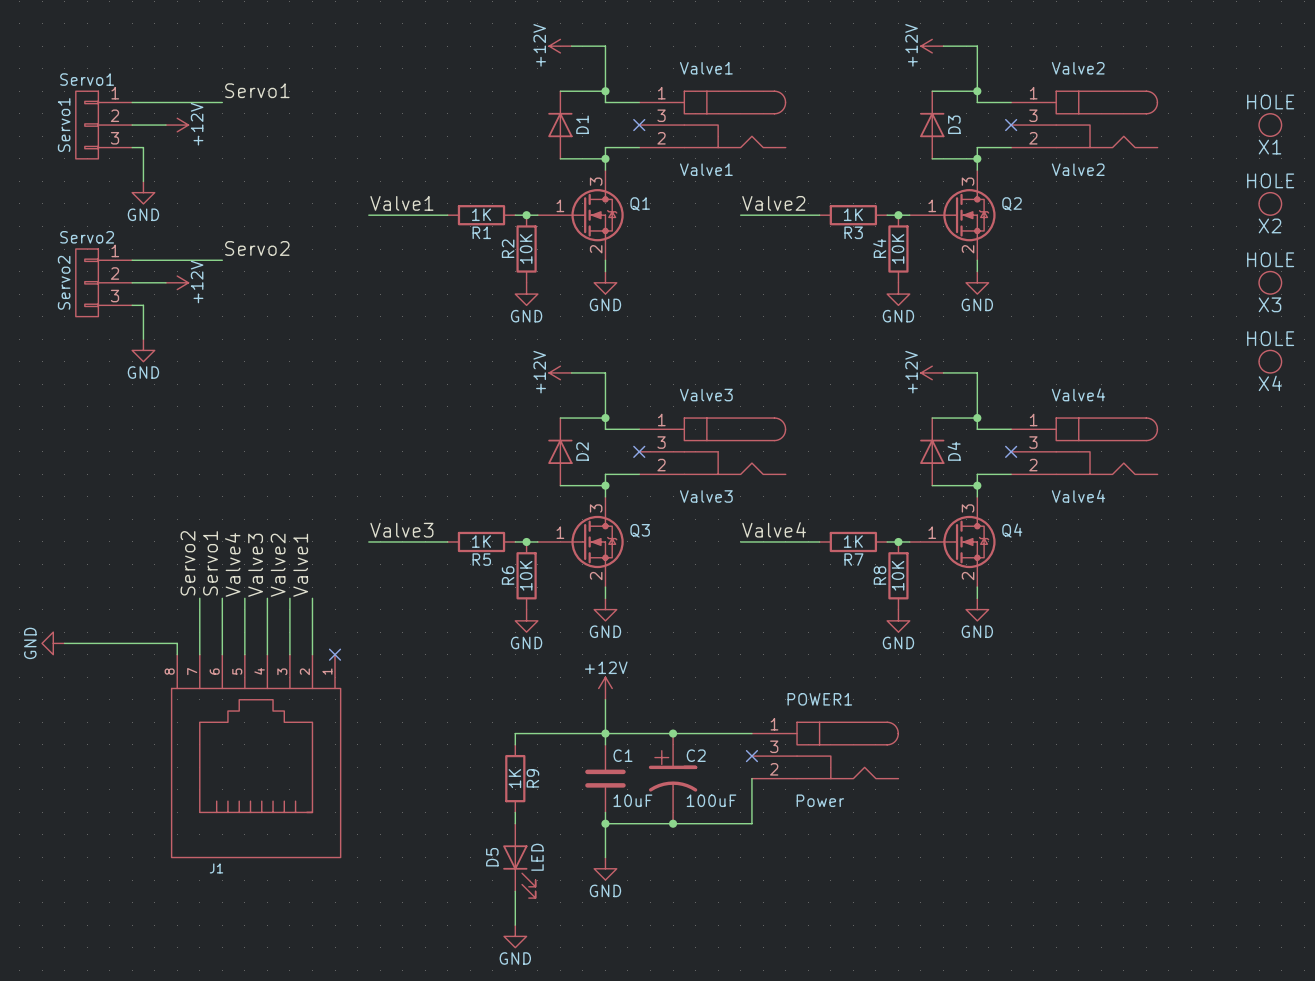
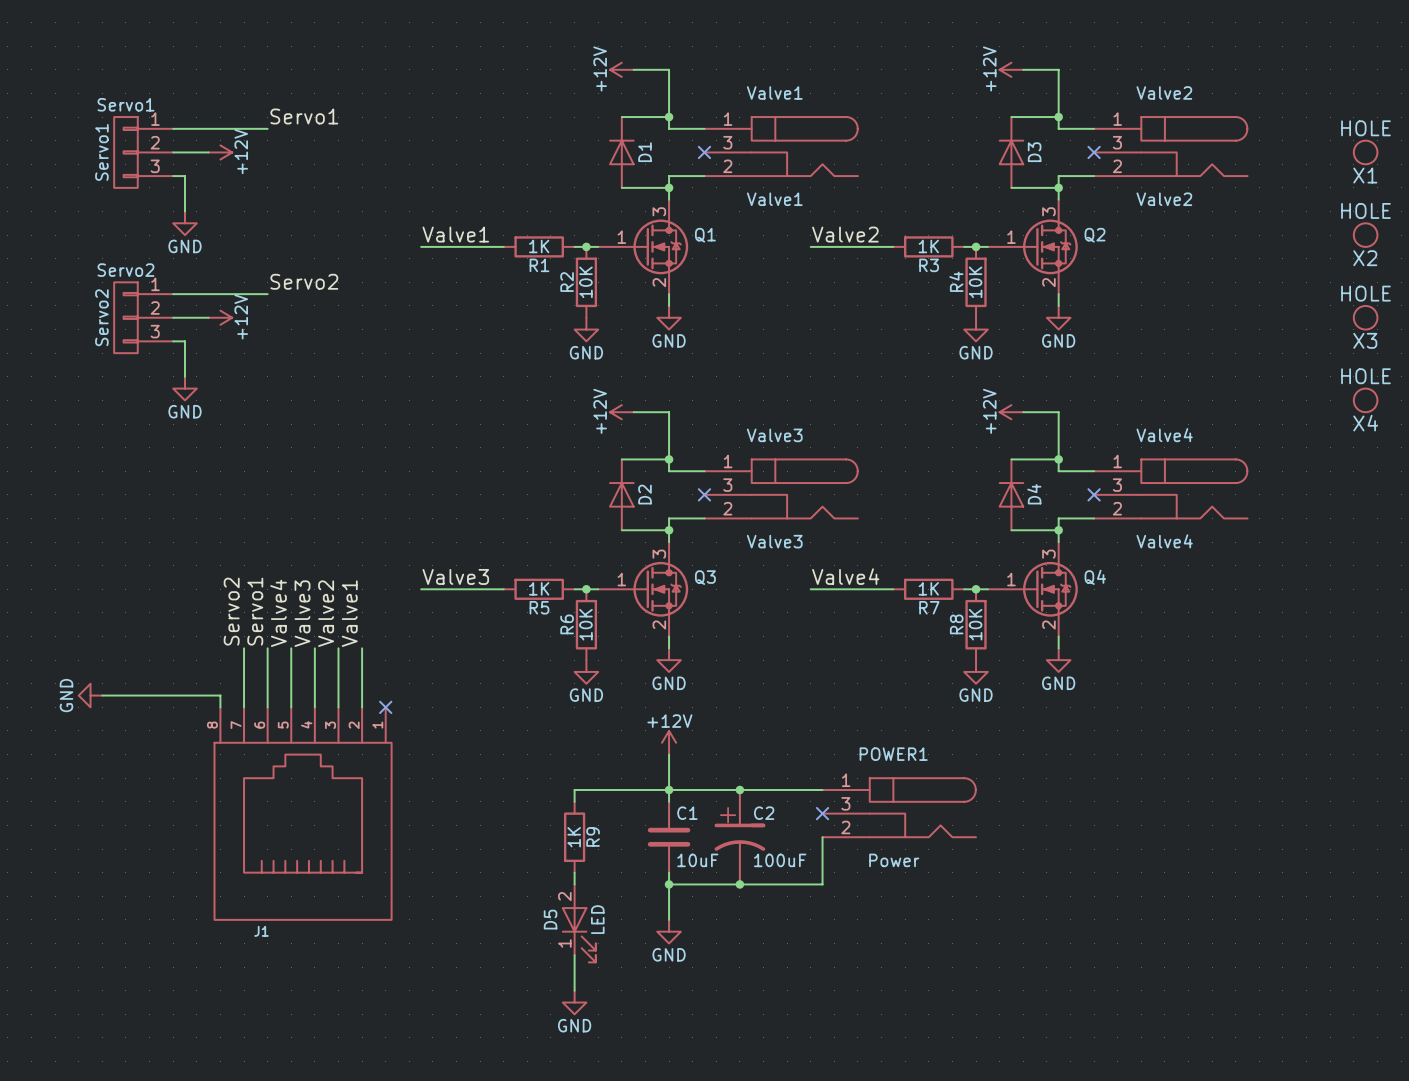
D5 pin number: none -> 2 (564, 896)
D5 pin number: none -> 1 (564, 943)

